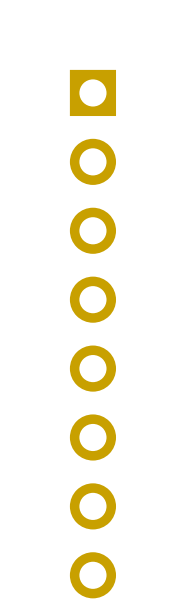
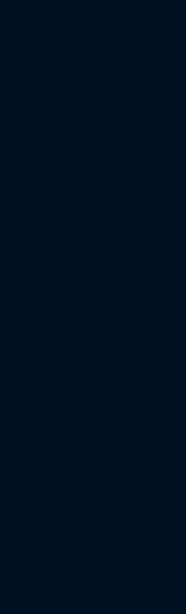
part: (92, 334) -> none

